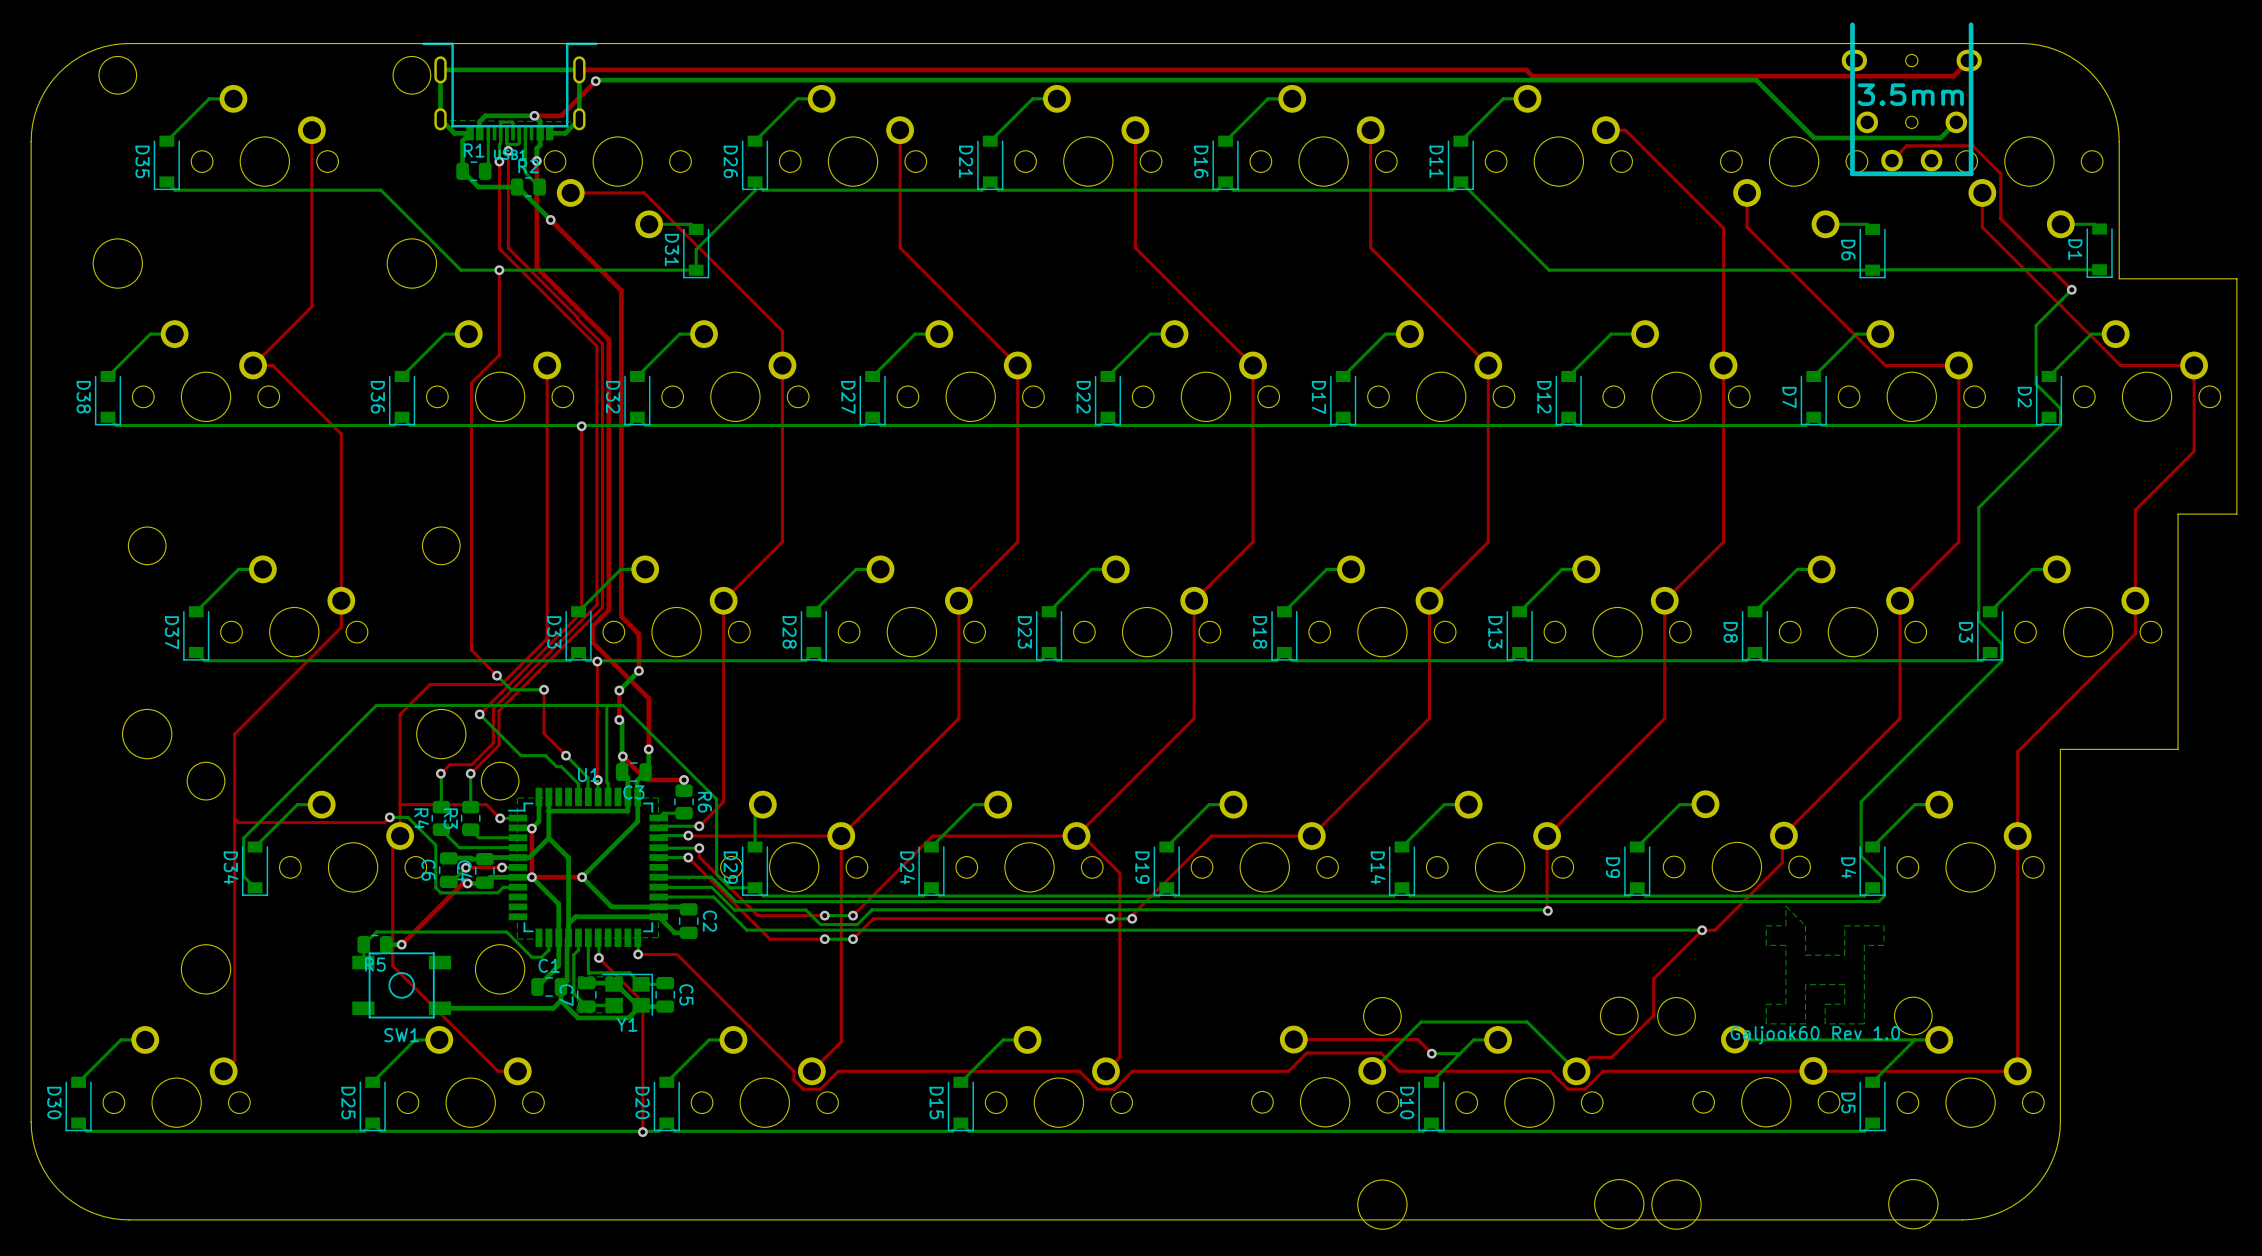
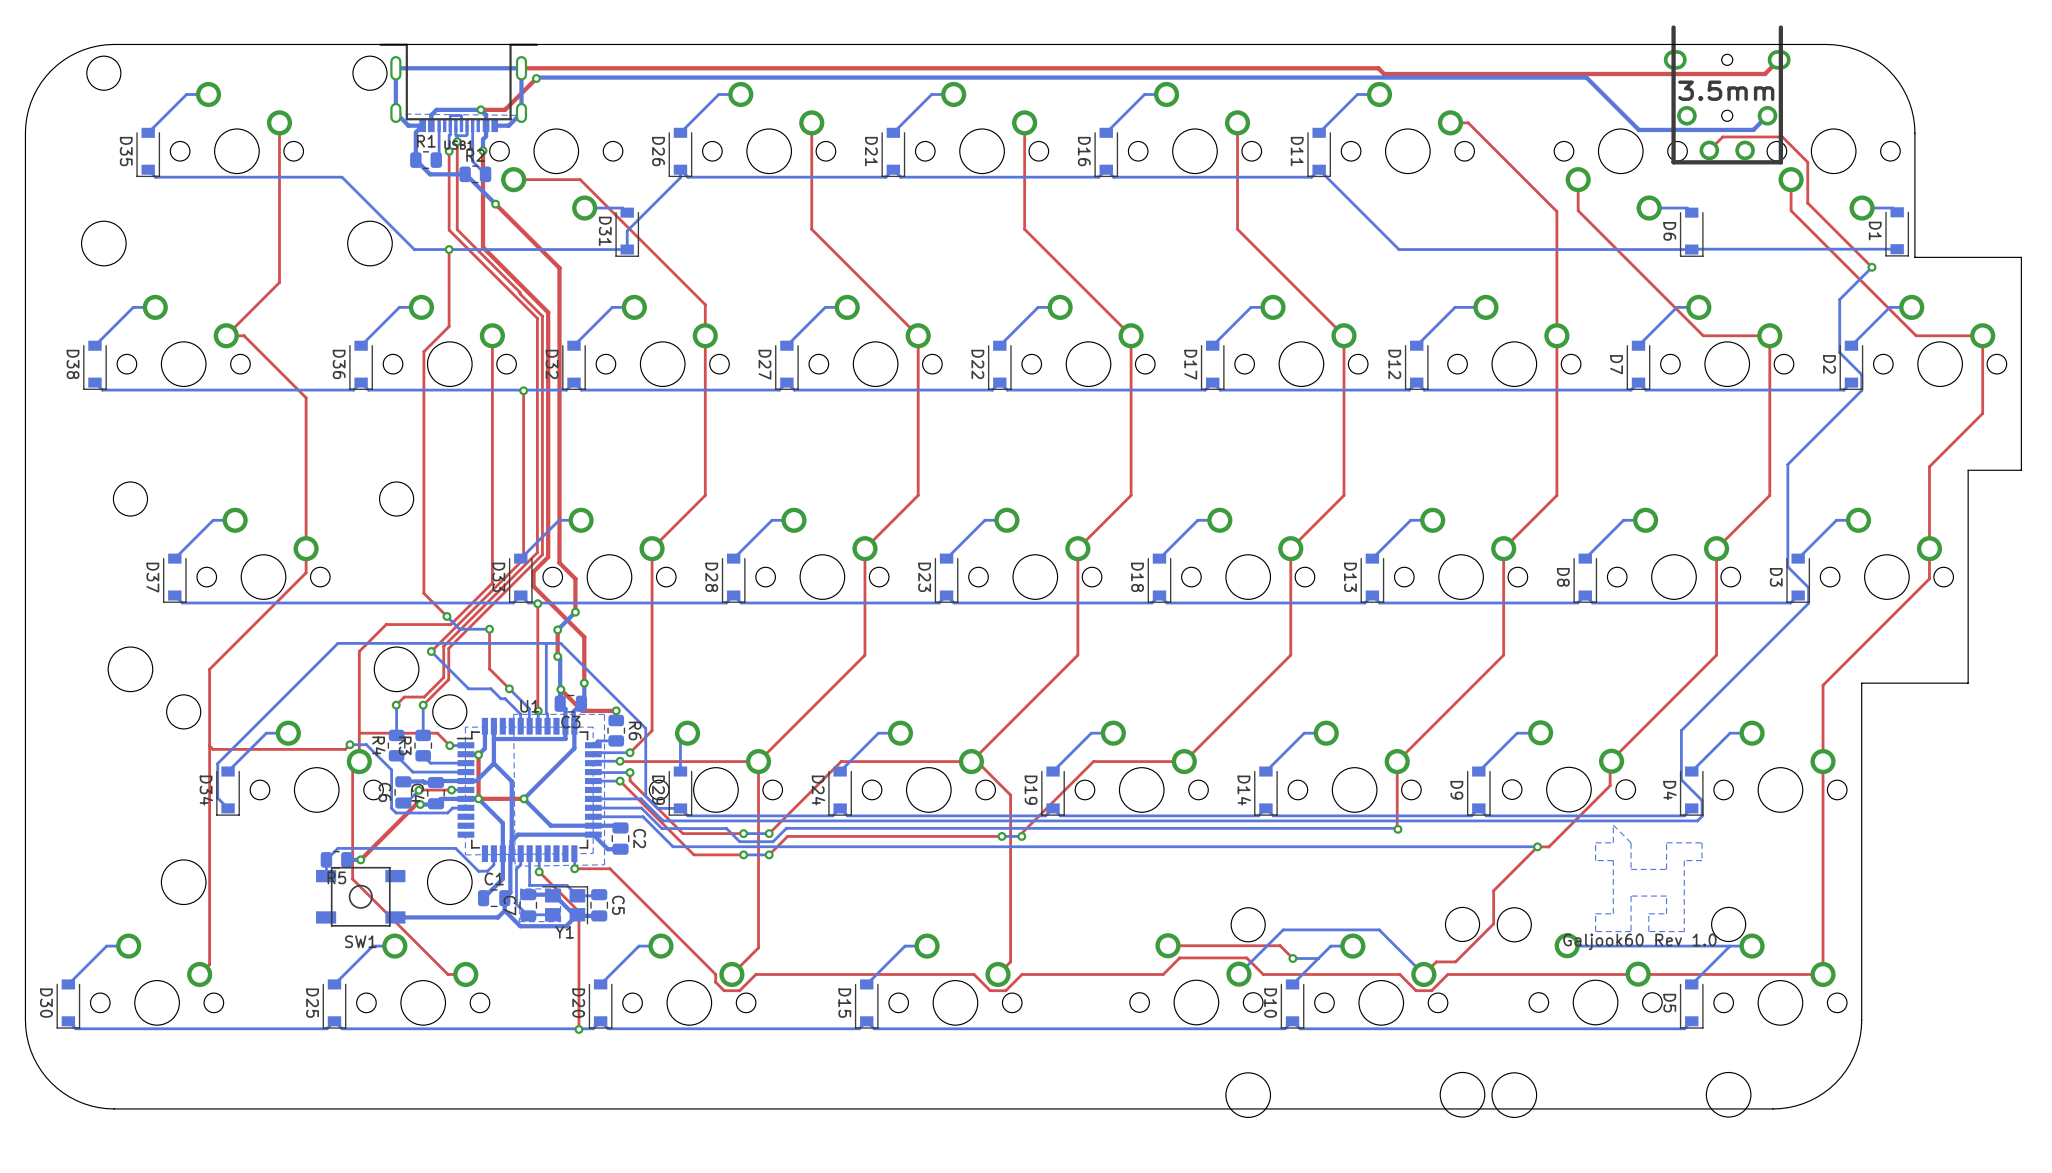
bottom zone outline: none -> (604, 714) (604, 864) (515, 866) (513, 714) (604, 714)

